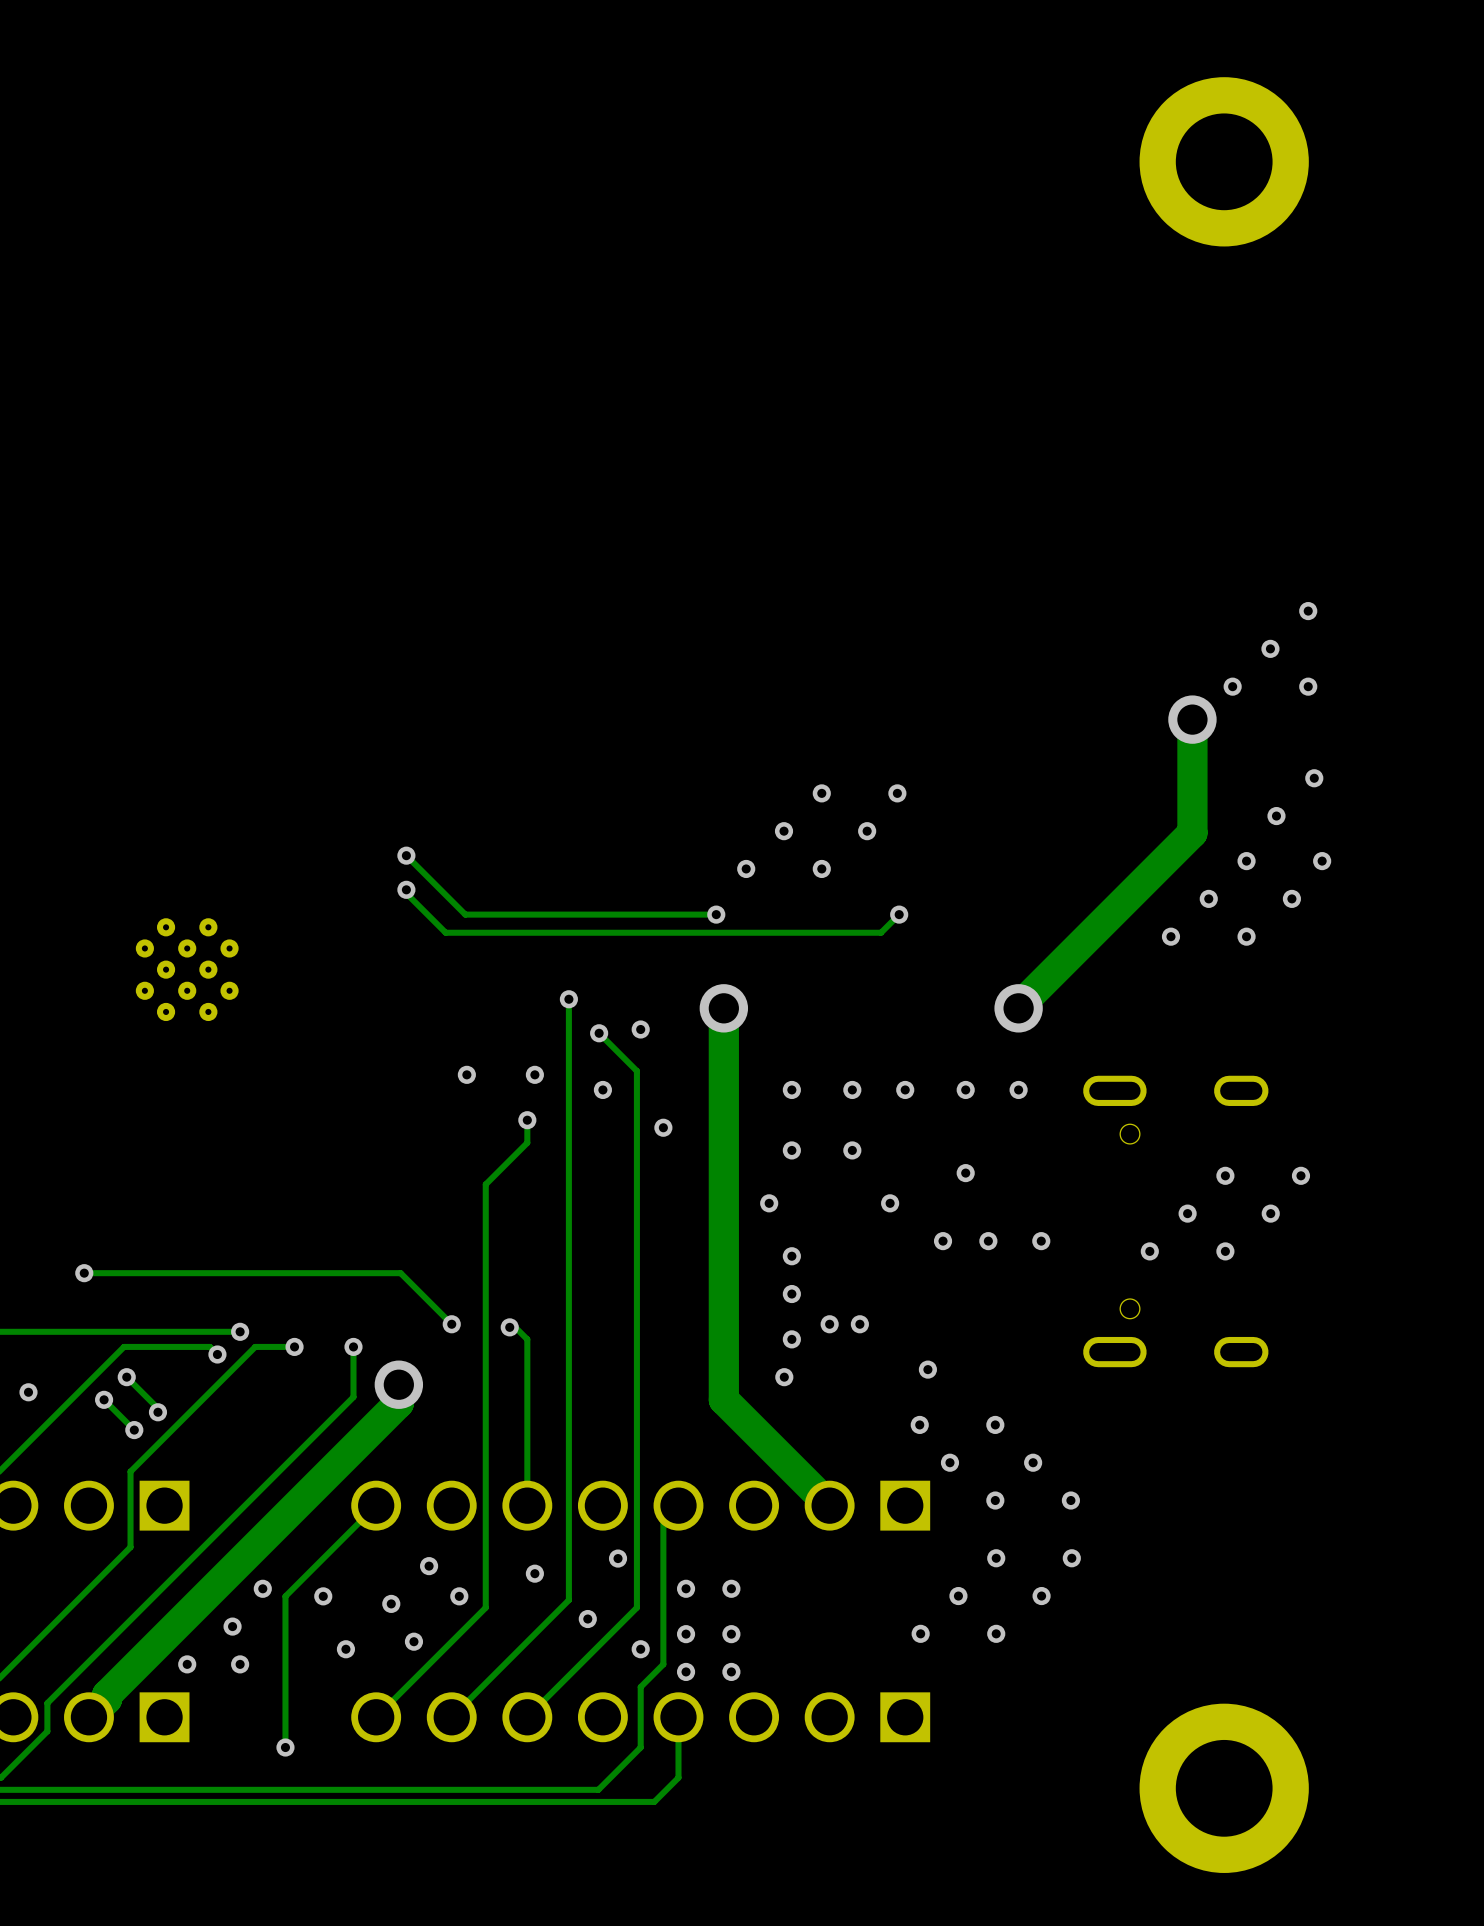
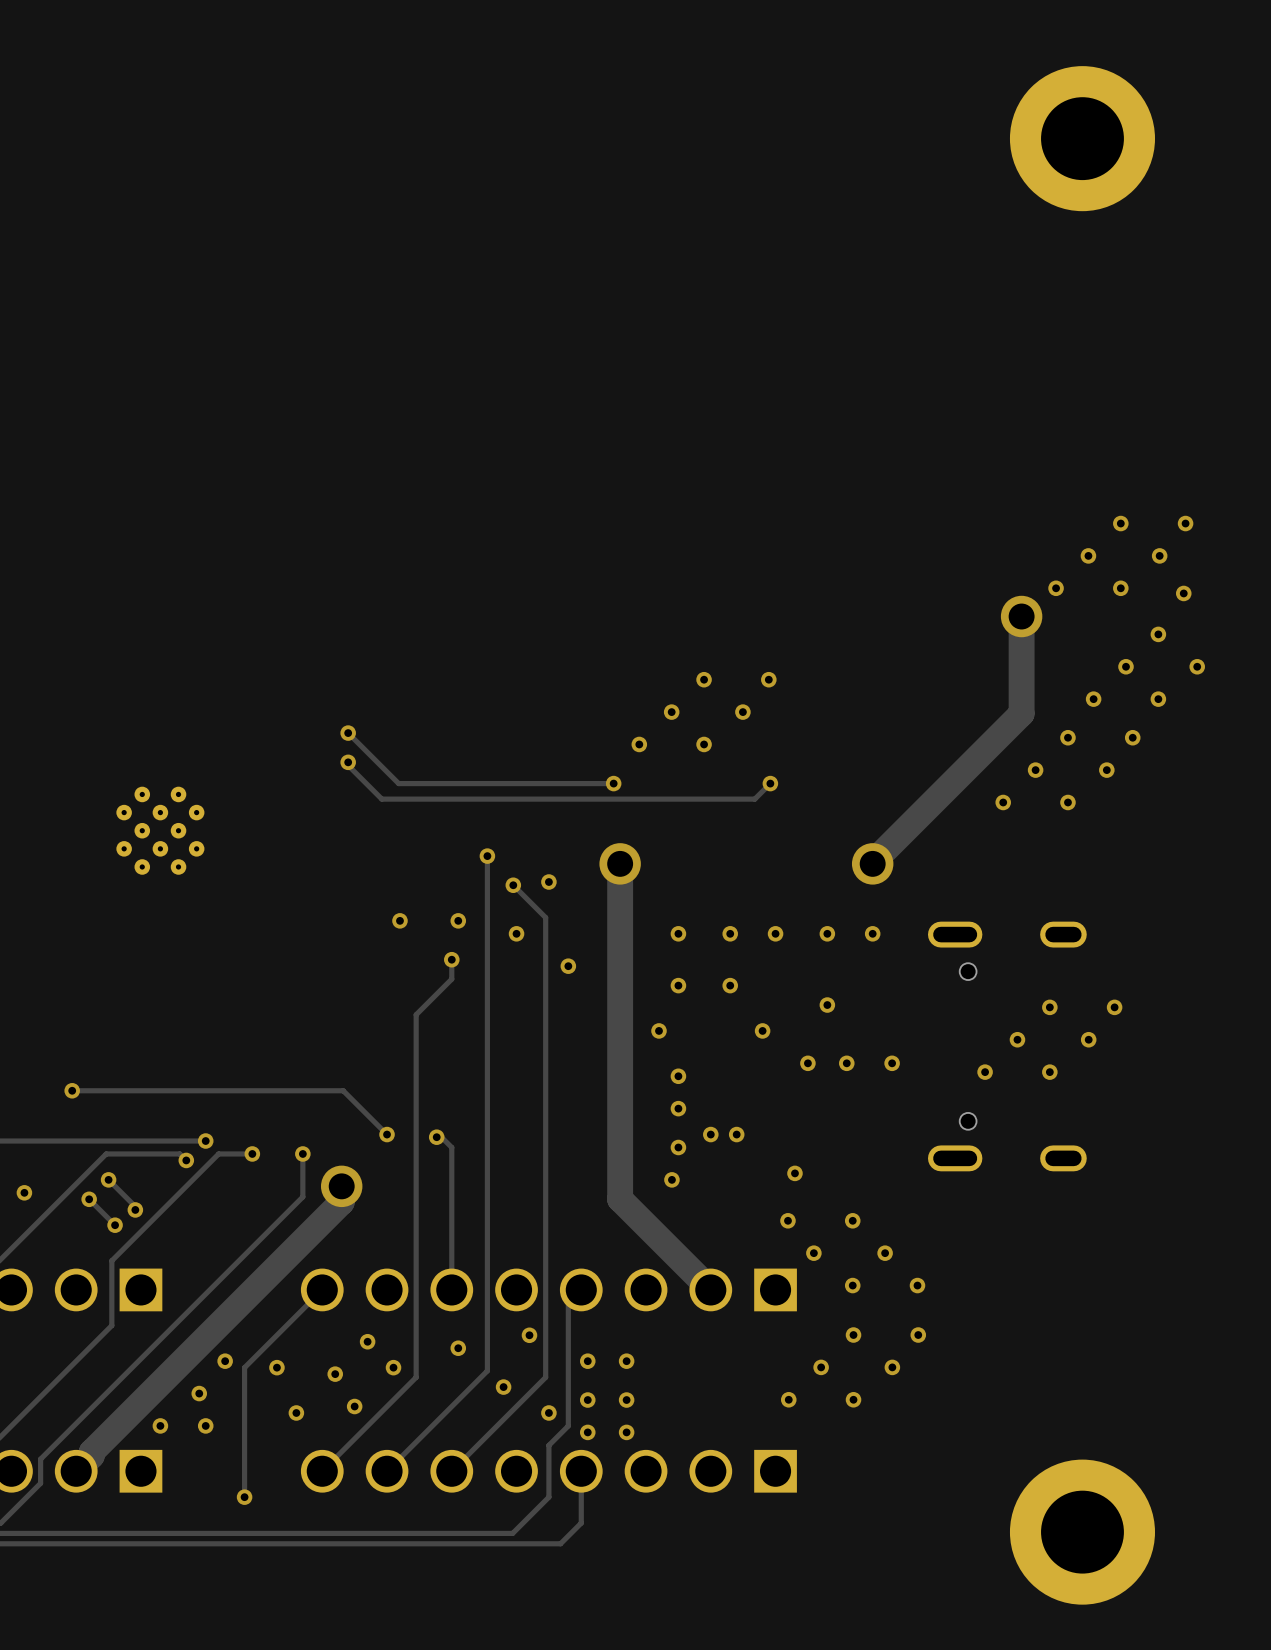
part position: (1224, 161) -> (1082, 138)
via: none -> (1185, 523)
via: none -> (1159, 555)
via: none -> (1183, 593)
via: none -> (1158, 634)
via: none -> (1197, 666)
via: none -> (1158, 699)
part position: (1224, 1788) -> (1082, 1532)

